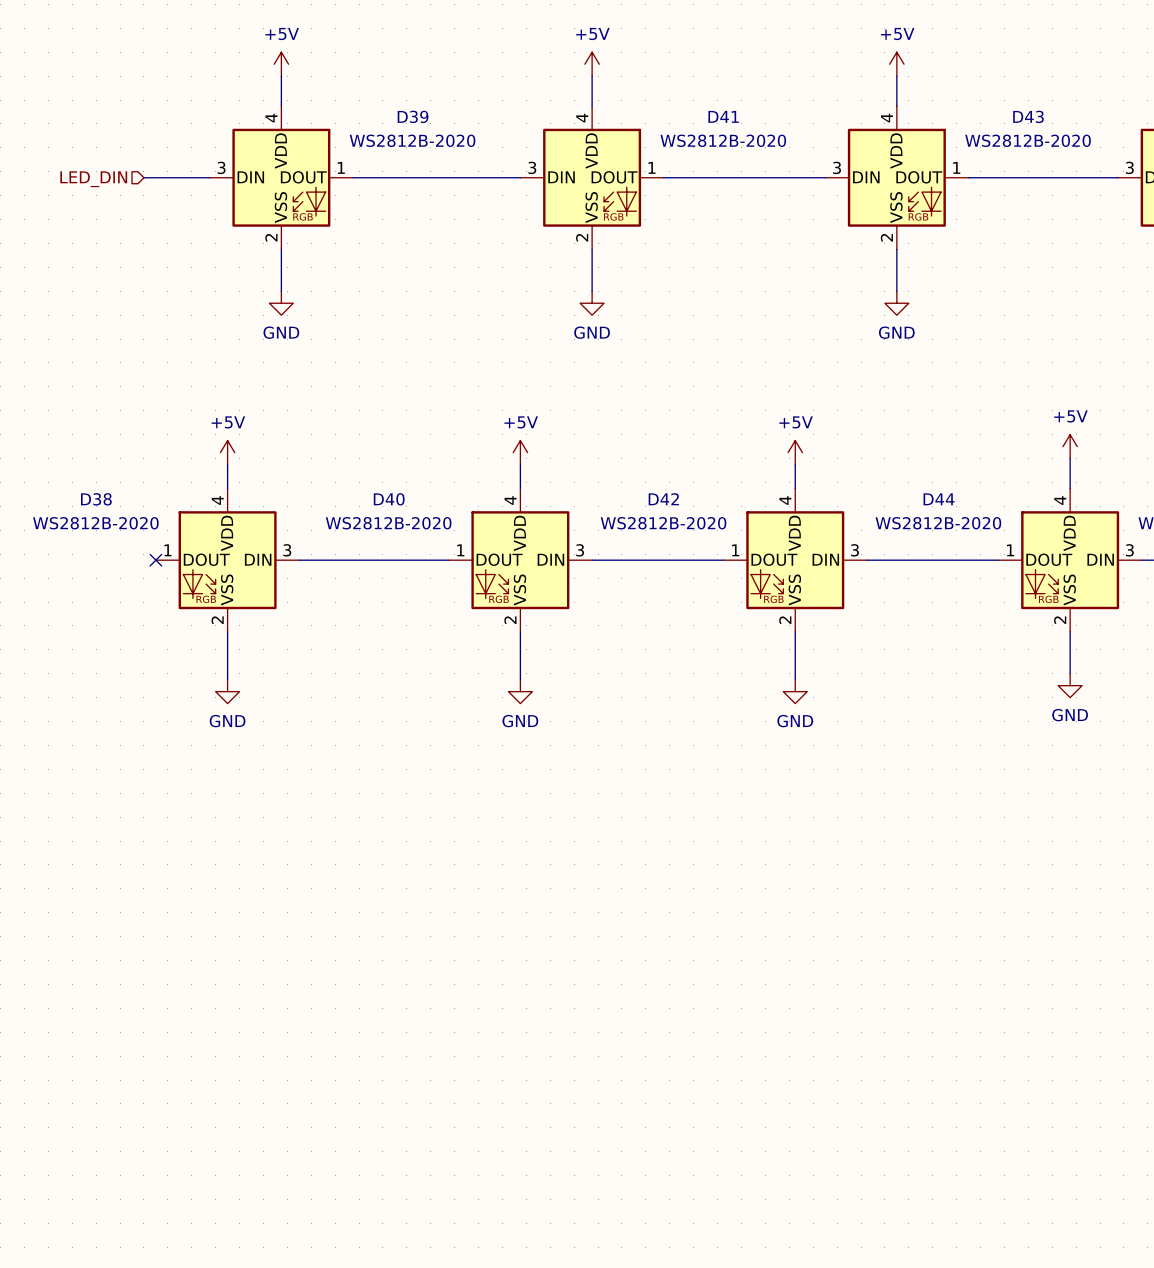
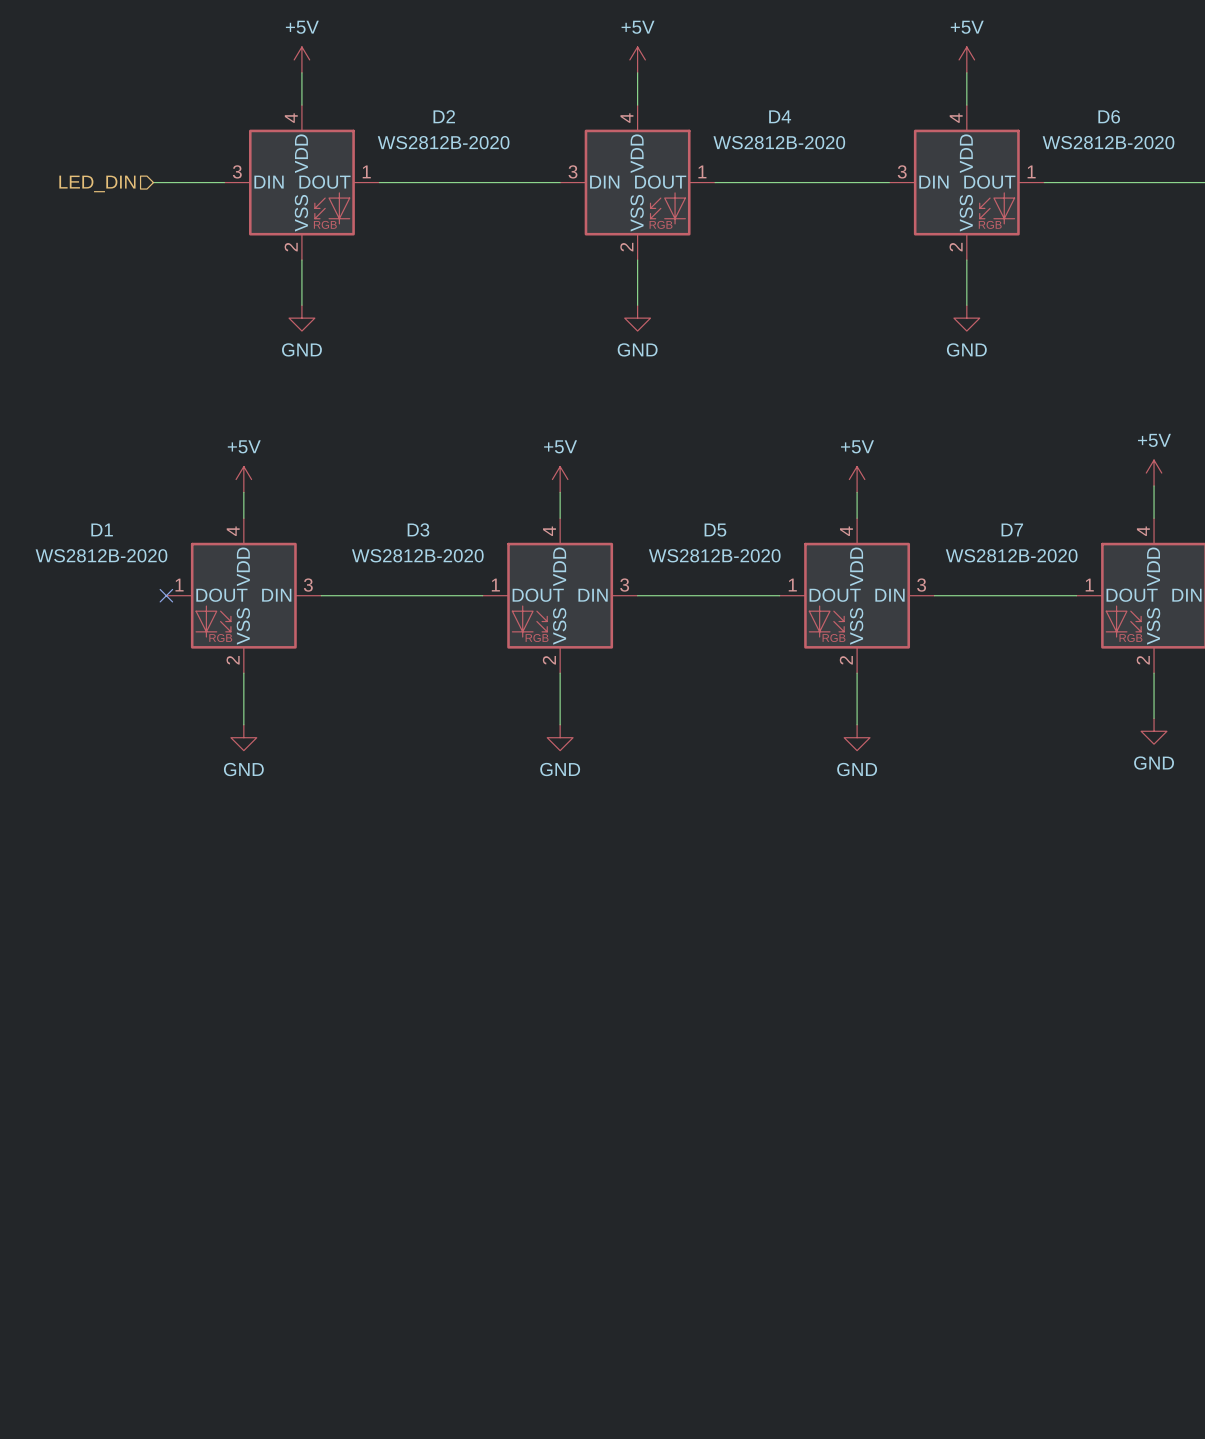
D39 name: D39 (413, 116) -> D2 (444, 116)
D41 name: D41 (723, 116) -> D4 (780, 116)
D43 name: D43 (1028, 116) -> D6 (1109, 116)
D38 name: D38 (96, 499) -> D1 (102, 529)
D40 name: D40 (389, 499) -> D3 (418, 529)
D42 name: D42 (663, 499) -> D5 (715, 530)
D44 name: D44 (939, 499) -> D7 (1012, 529)

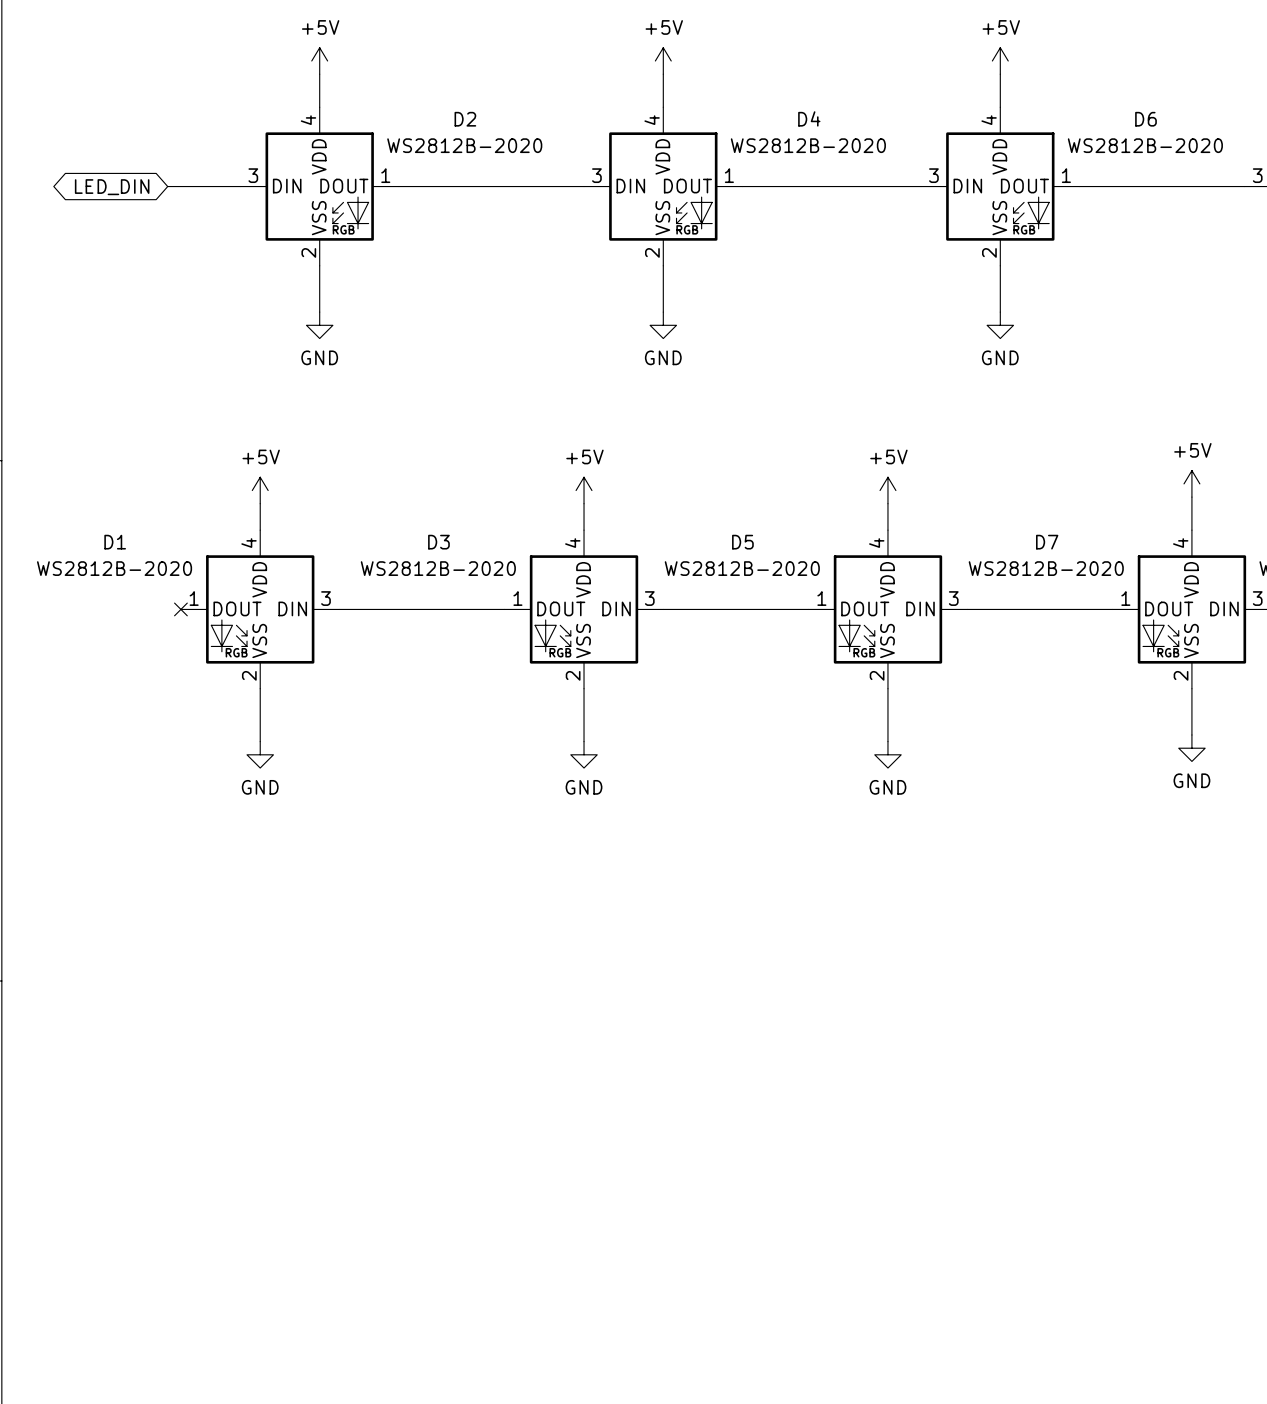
hierarchical label: LED_DIN (97, 183) -> none
global label: none -> LED_DIN (112, 187)

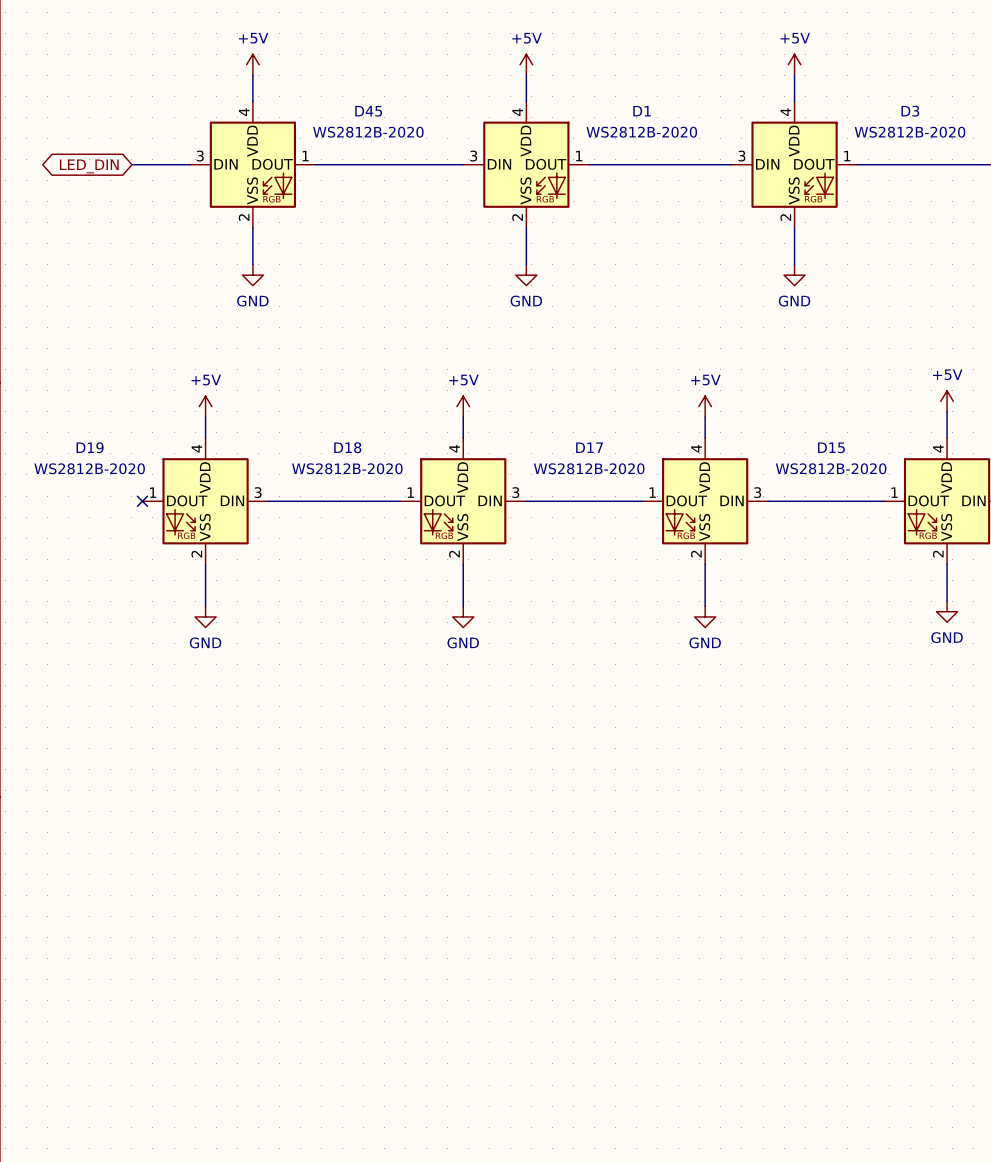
D4 name: D4 (809, 118) -> D1 (642, 111)
D2 name: D2 (465, 119) -> D45 (368, 111)
D6 name: D6 (1146, 119) -> D3 (910, 111)
D1 name: D1 (115, 542) -> D19 (90, 447)
D3 name: D3 (438, 542) -> D18 (347, 447)
D5 name: D5 (742, 542) -> D17 (589, 447)
D7 name: D7 (1047, 542) -> D15 (831, 447)

